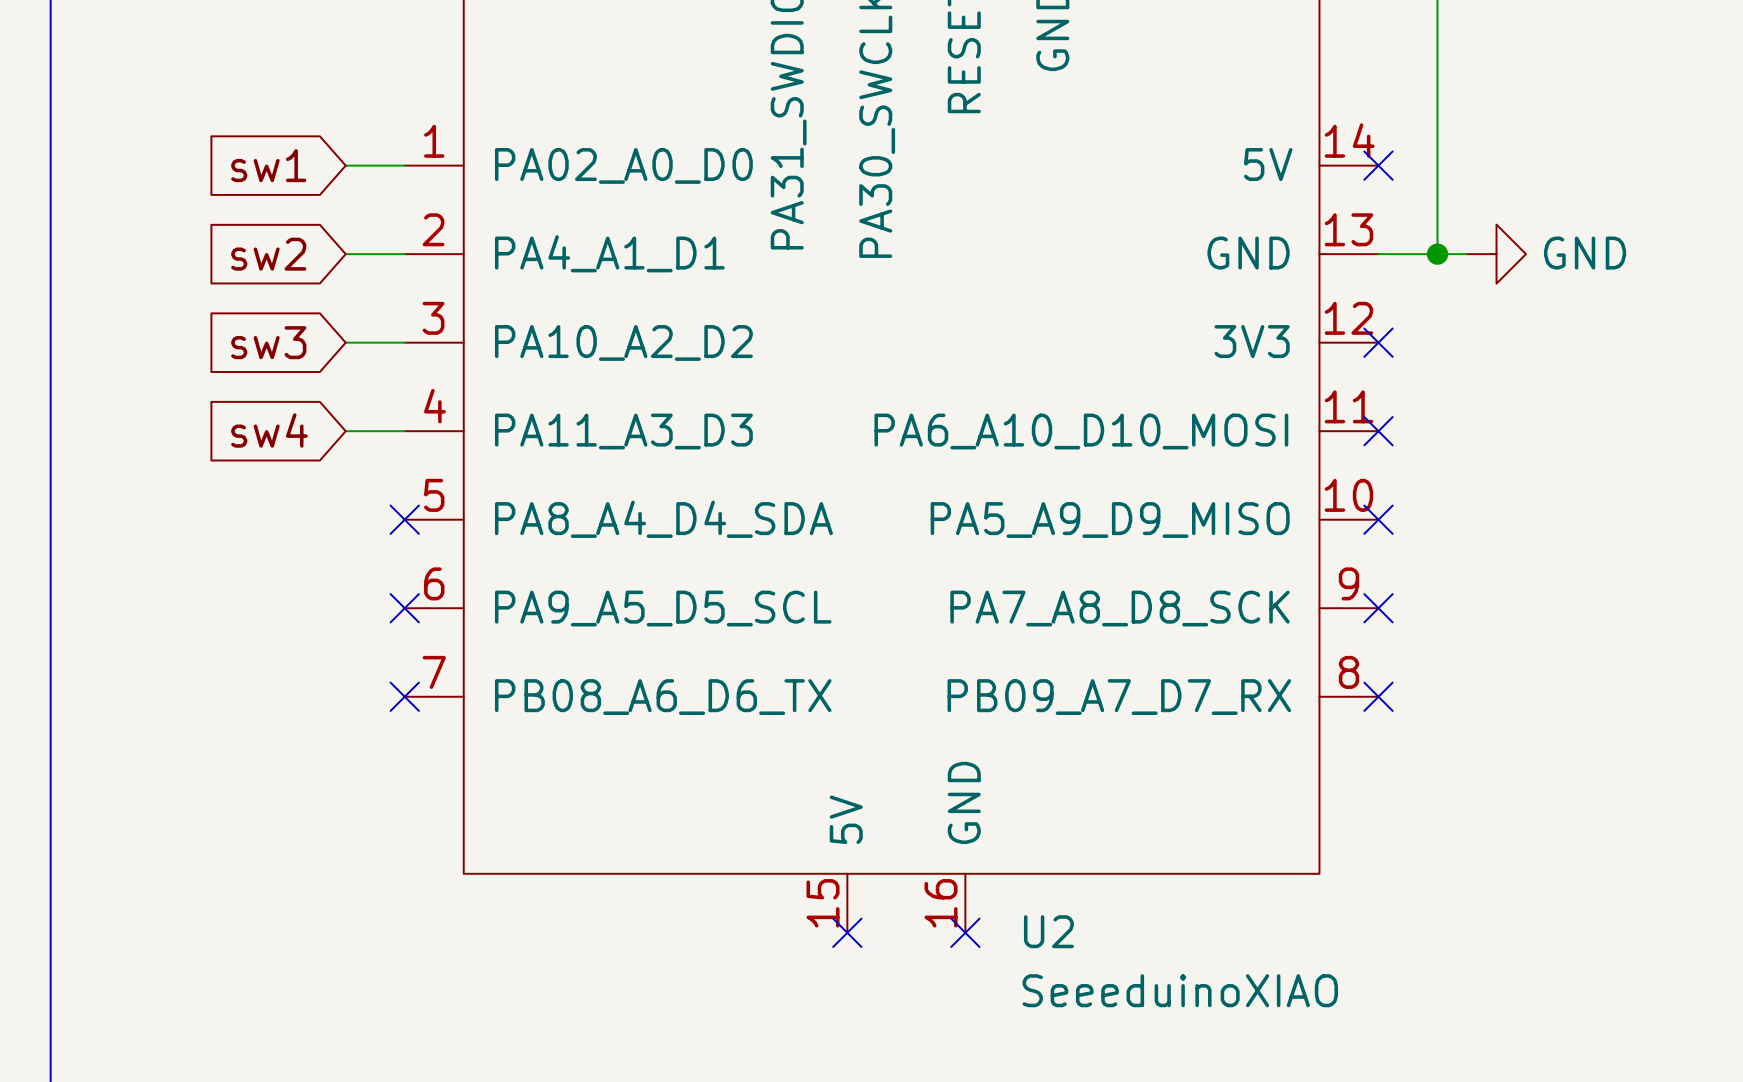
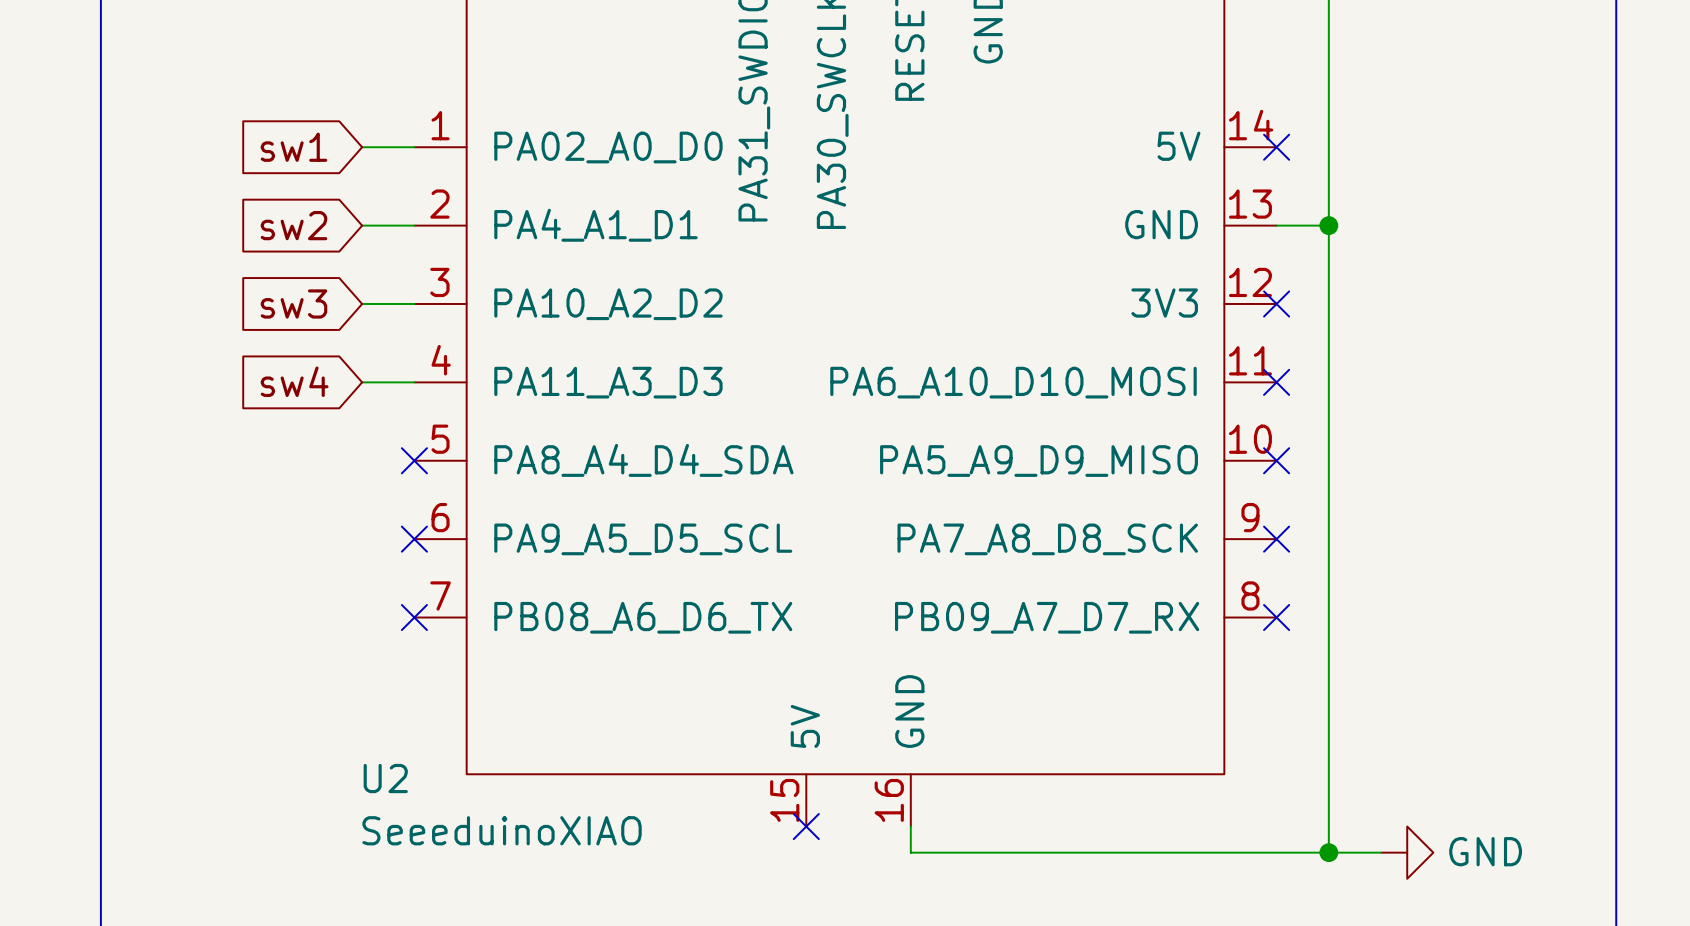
wire: (1437, 254) (1467, 254) -> (1328, 225) (1328, 852)
power symbol: GND (1496, 254) -> none
U2 name position: U2 (1048, 931) -> U2 (385, 778)
wire: none -> (910, 826) (910, 852) (1381, 852)
no-connect mark: (965, 932) -> none
junction: none -> (1328, 852)
power symbol: none -> GND (1407, 852)
U2 value position: SeeeduinoXIAO (1180, 990) -> SeeeduinoXIAO (502, 830)

